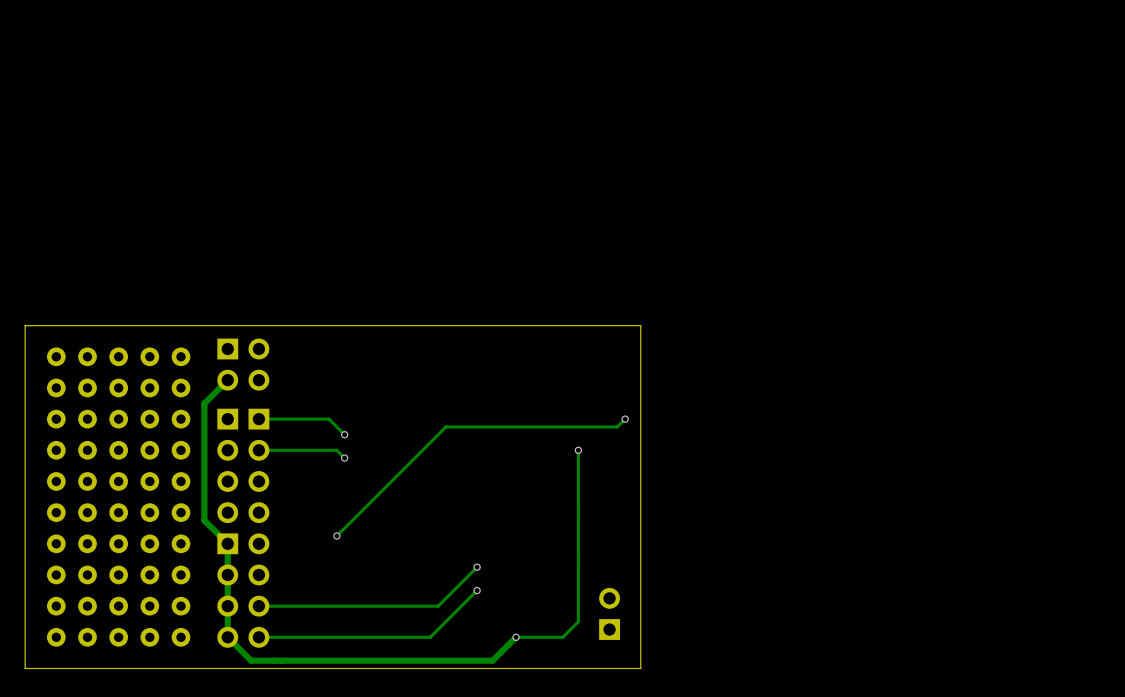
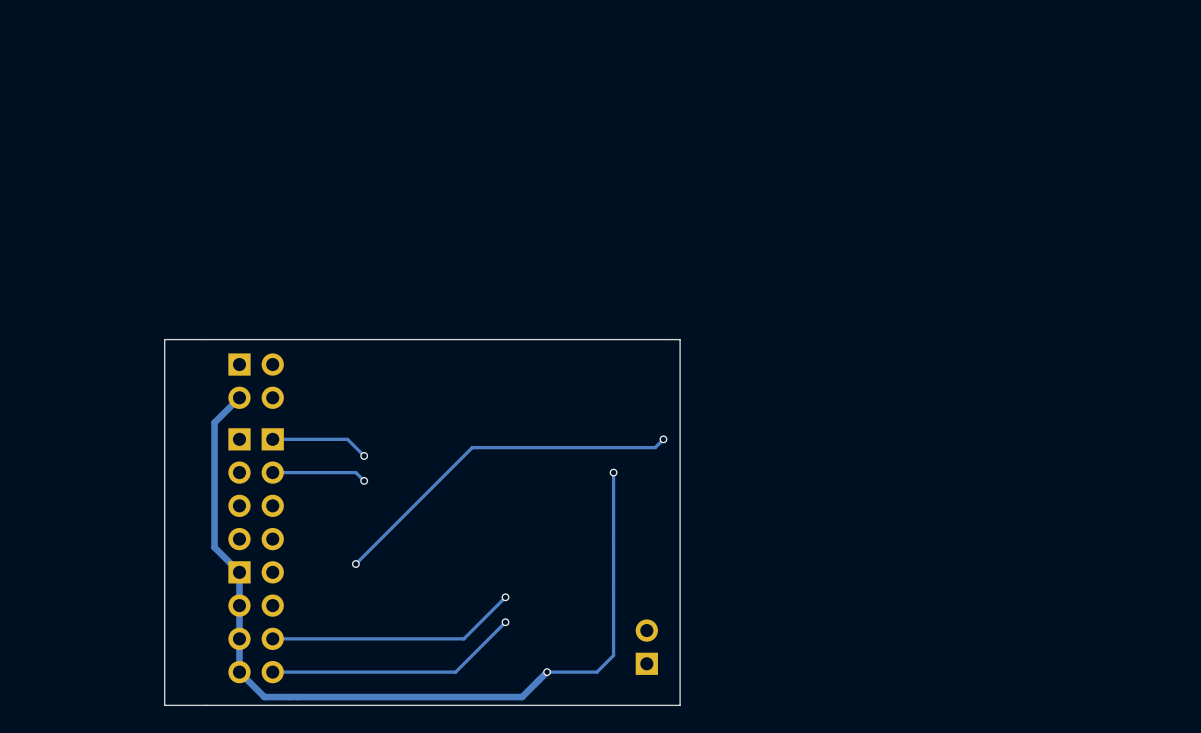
board edge: (157, 325) (25, 325) (25, 668) (157, 668) -> (164, 339) (164, 705)
part: (118, 497) -> none

